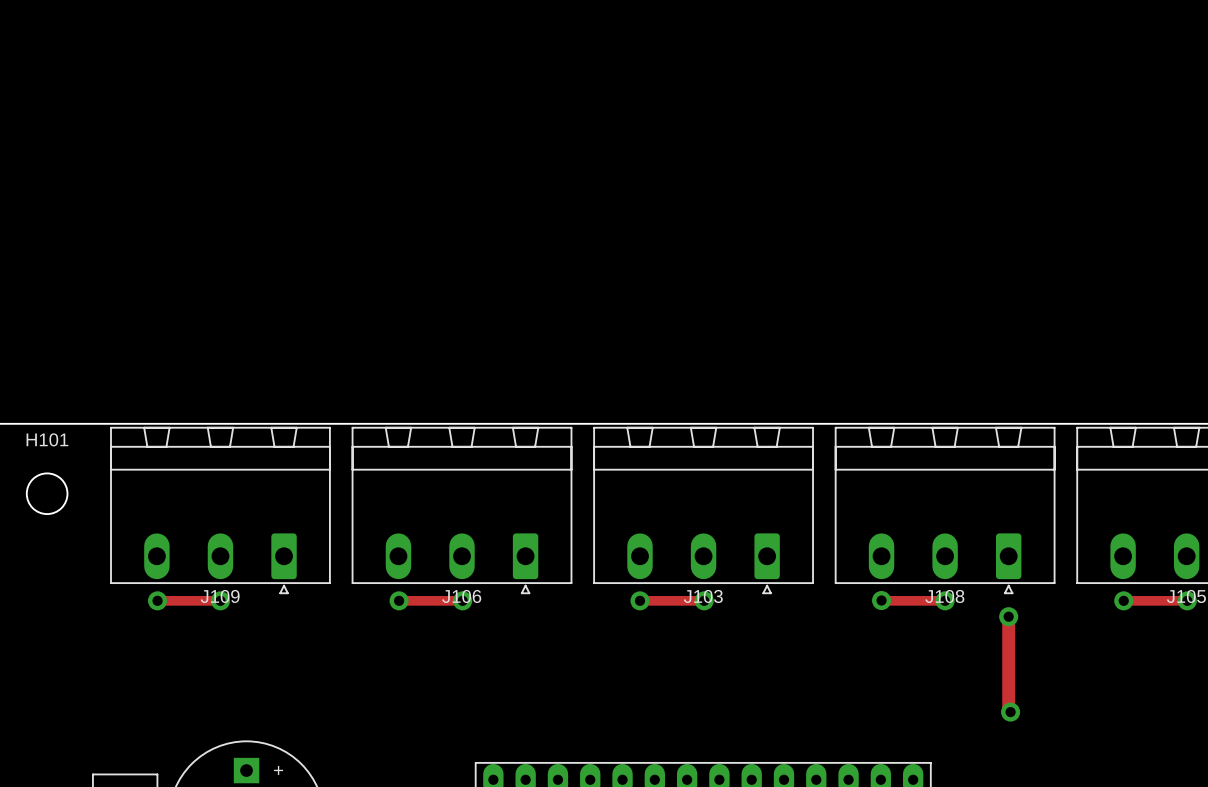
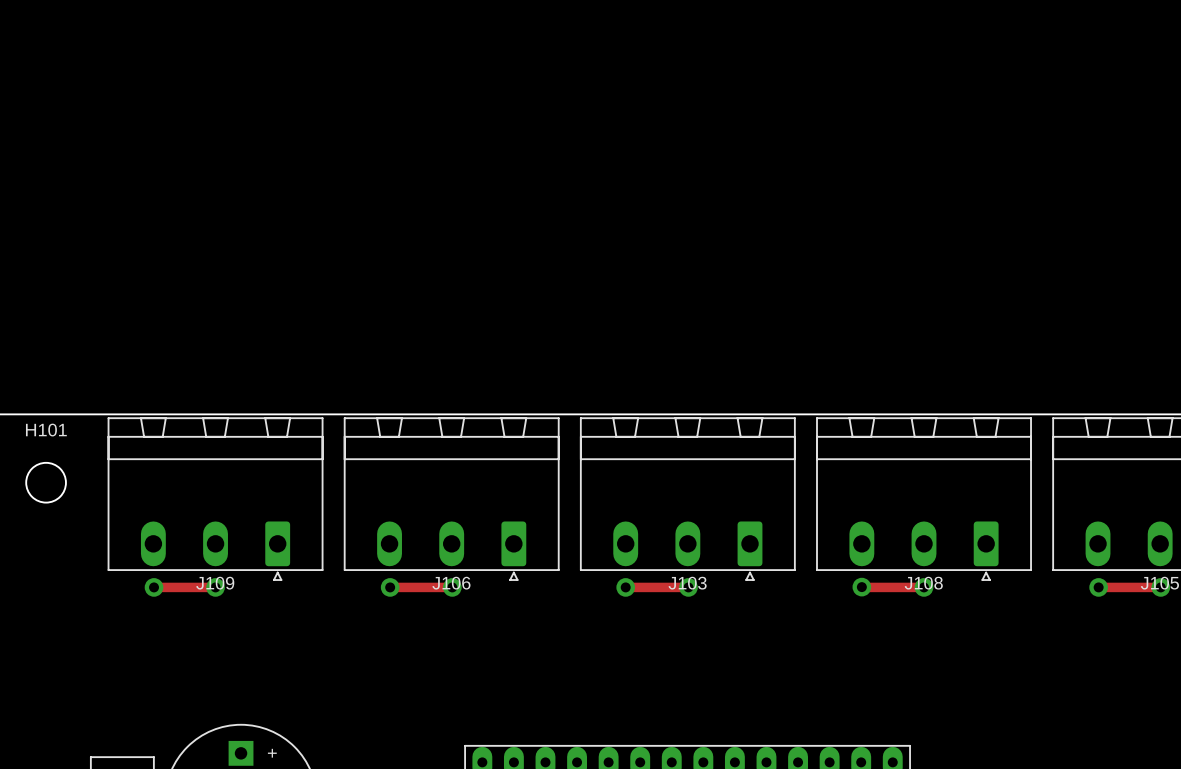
track: (1008, 616) (1008, 710) (1010, 712) -> none
via: (1008, 616) -> none
via: (1010, 712) -> none

